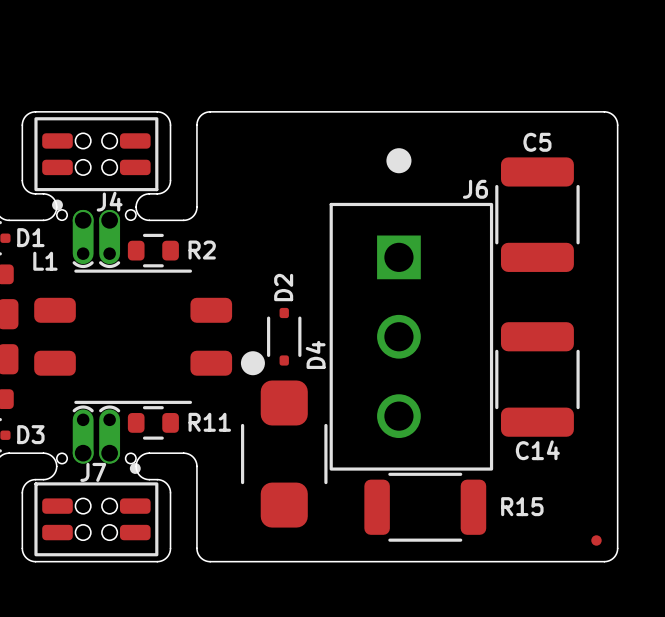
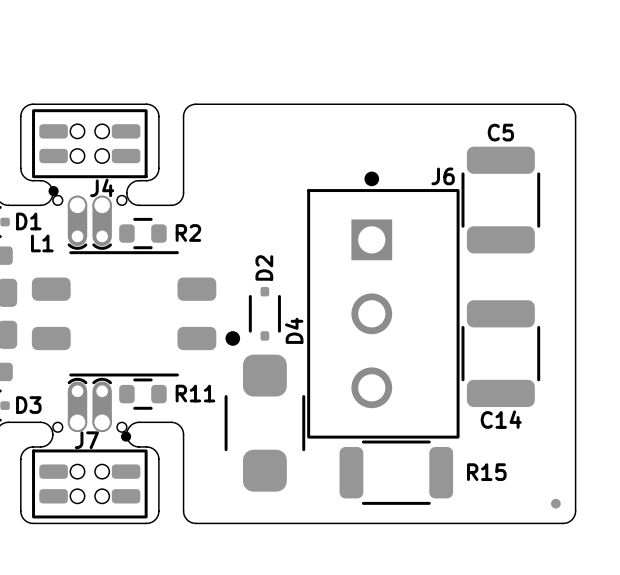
J6 footprint: [329, 148, 494, 471] -> [307, 171, 460, 439]
L1 footprint: [34, 269, 265, 404] -> [31, 251, 241, 377]

